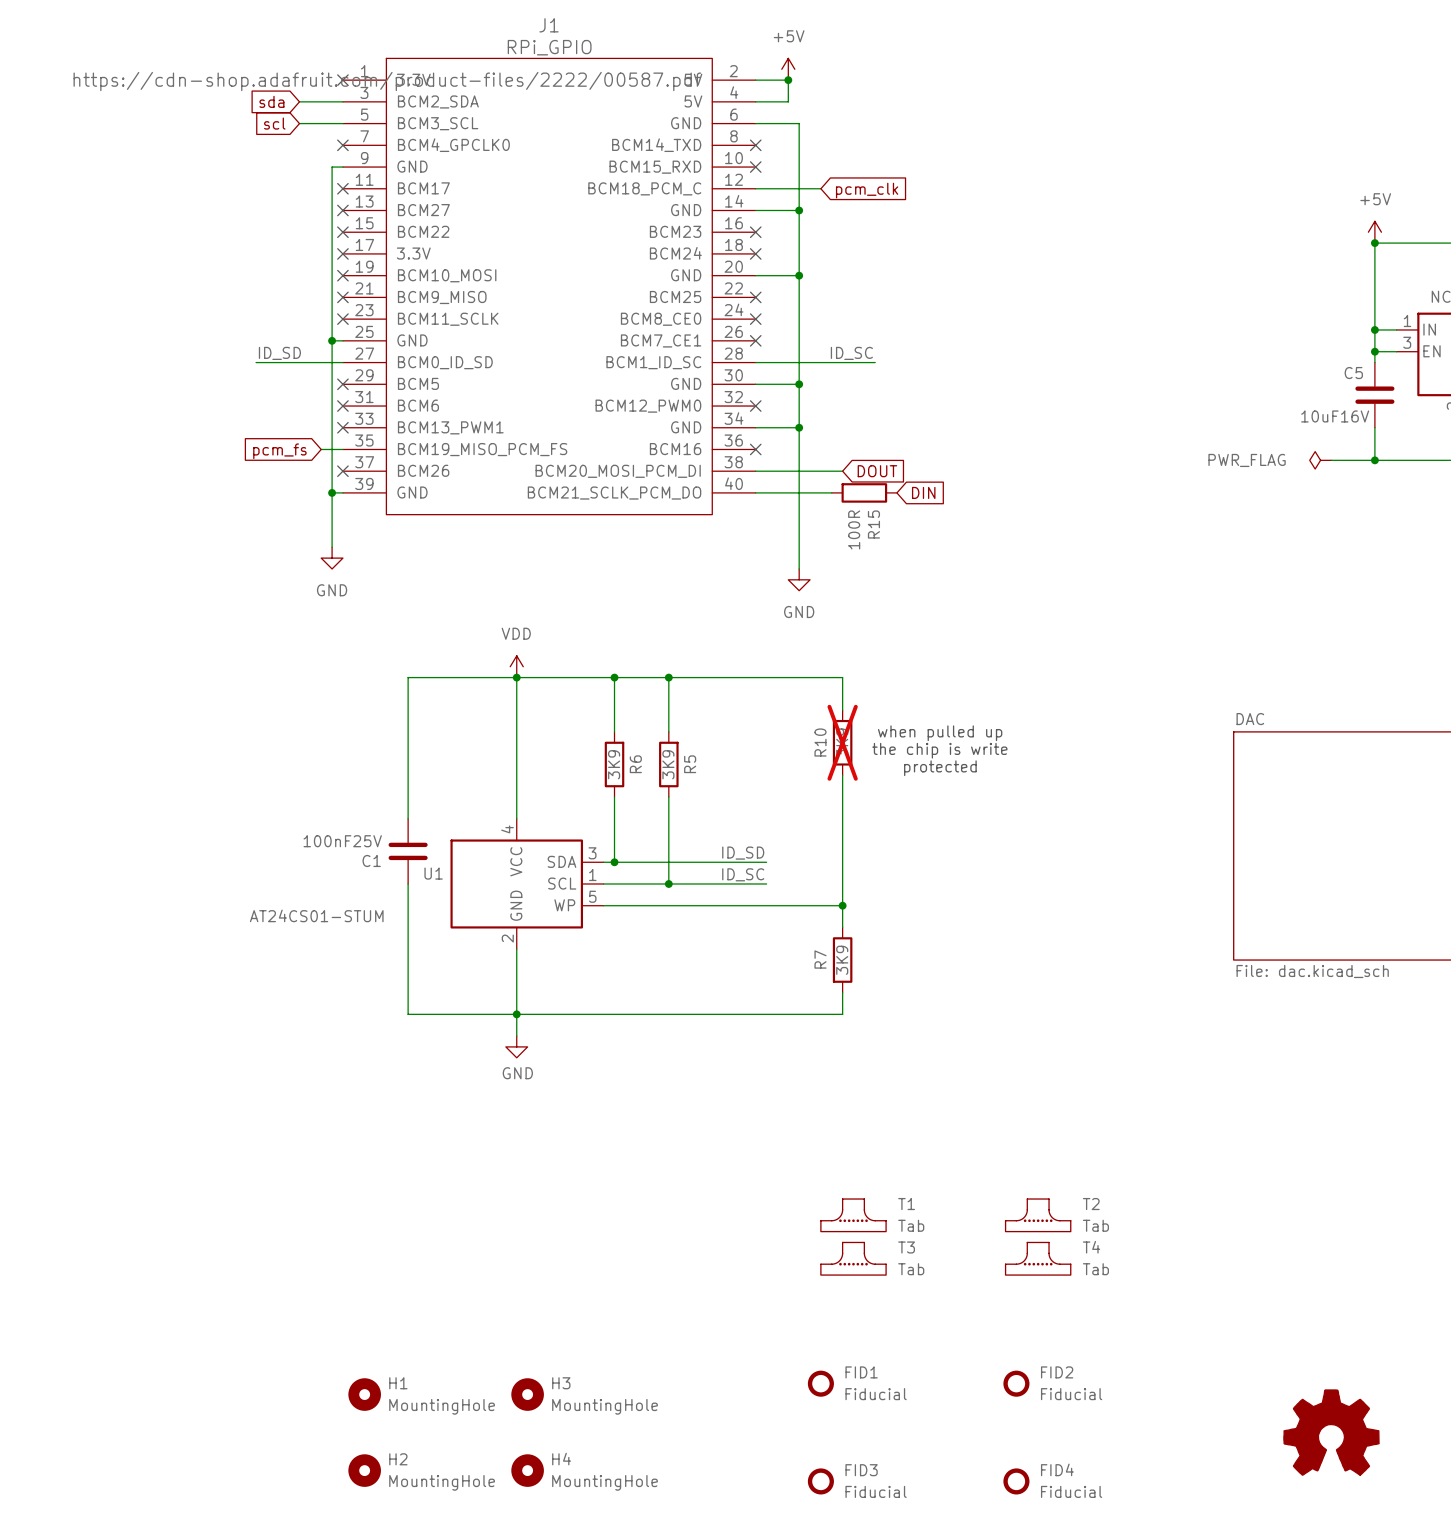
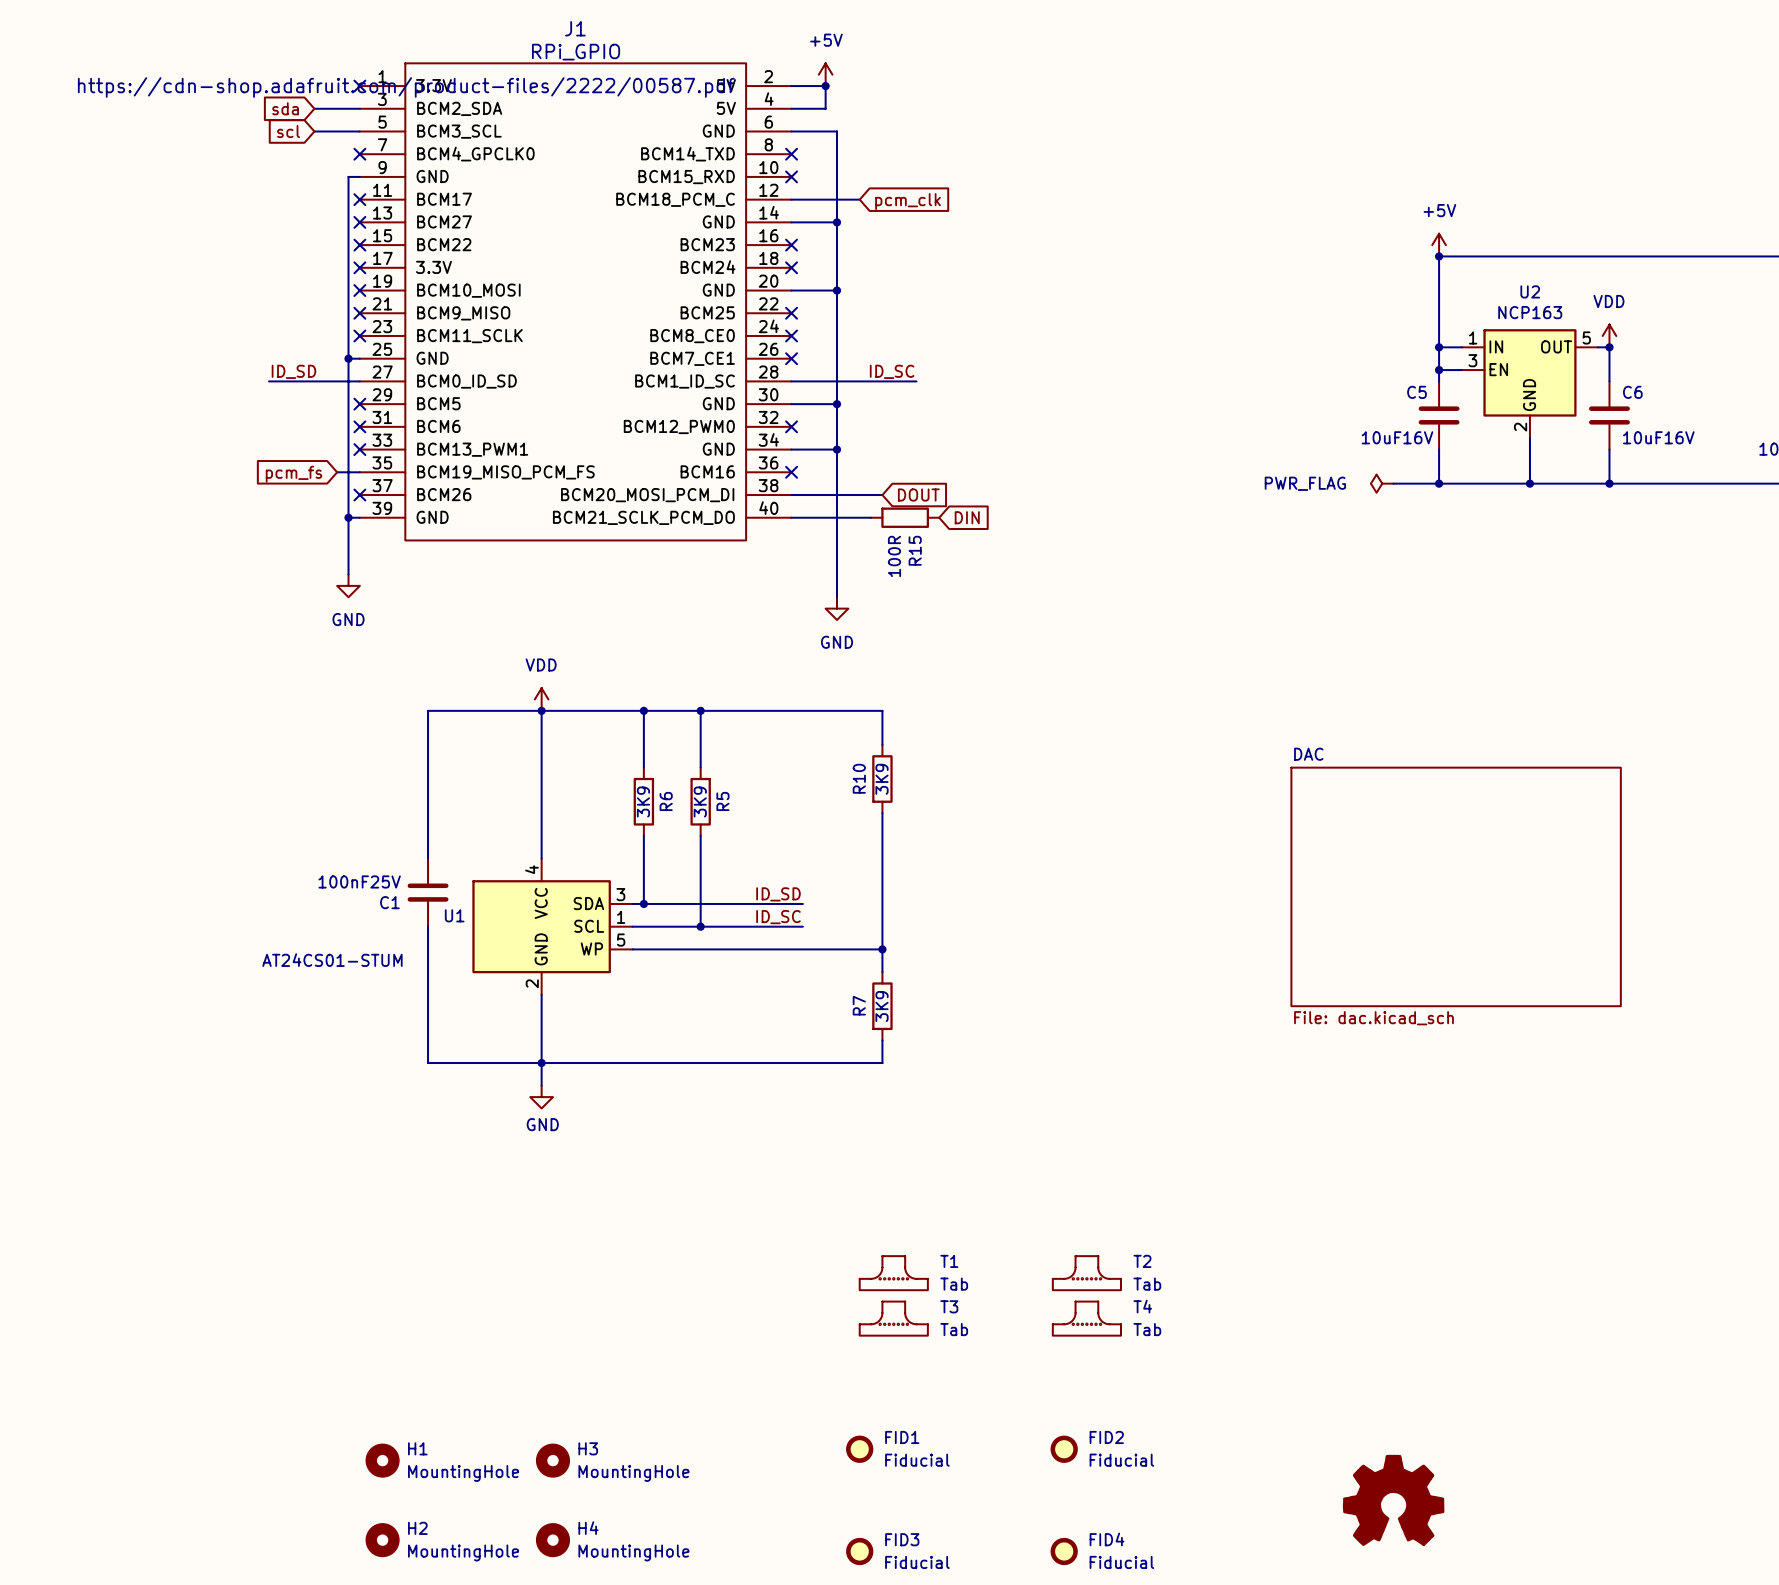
text: when pulled up (940, 733) -> none
R10 do-not-place cross: (842, 742) -> none
text: the chip is write (939, 750) -> none
text: protected (940, 768) -> none

